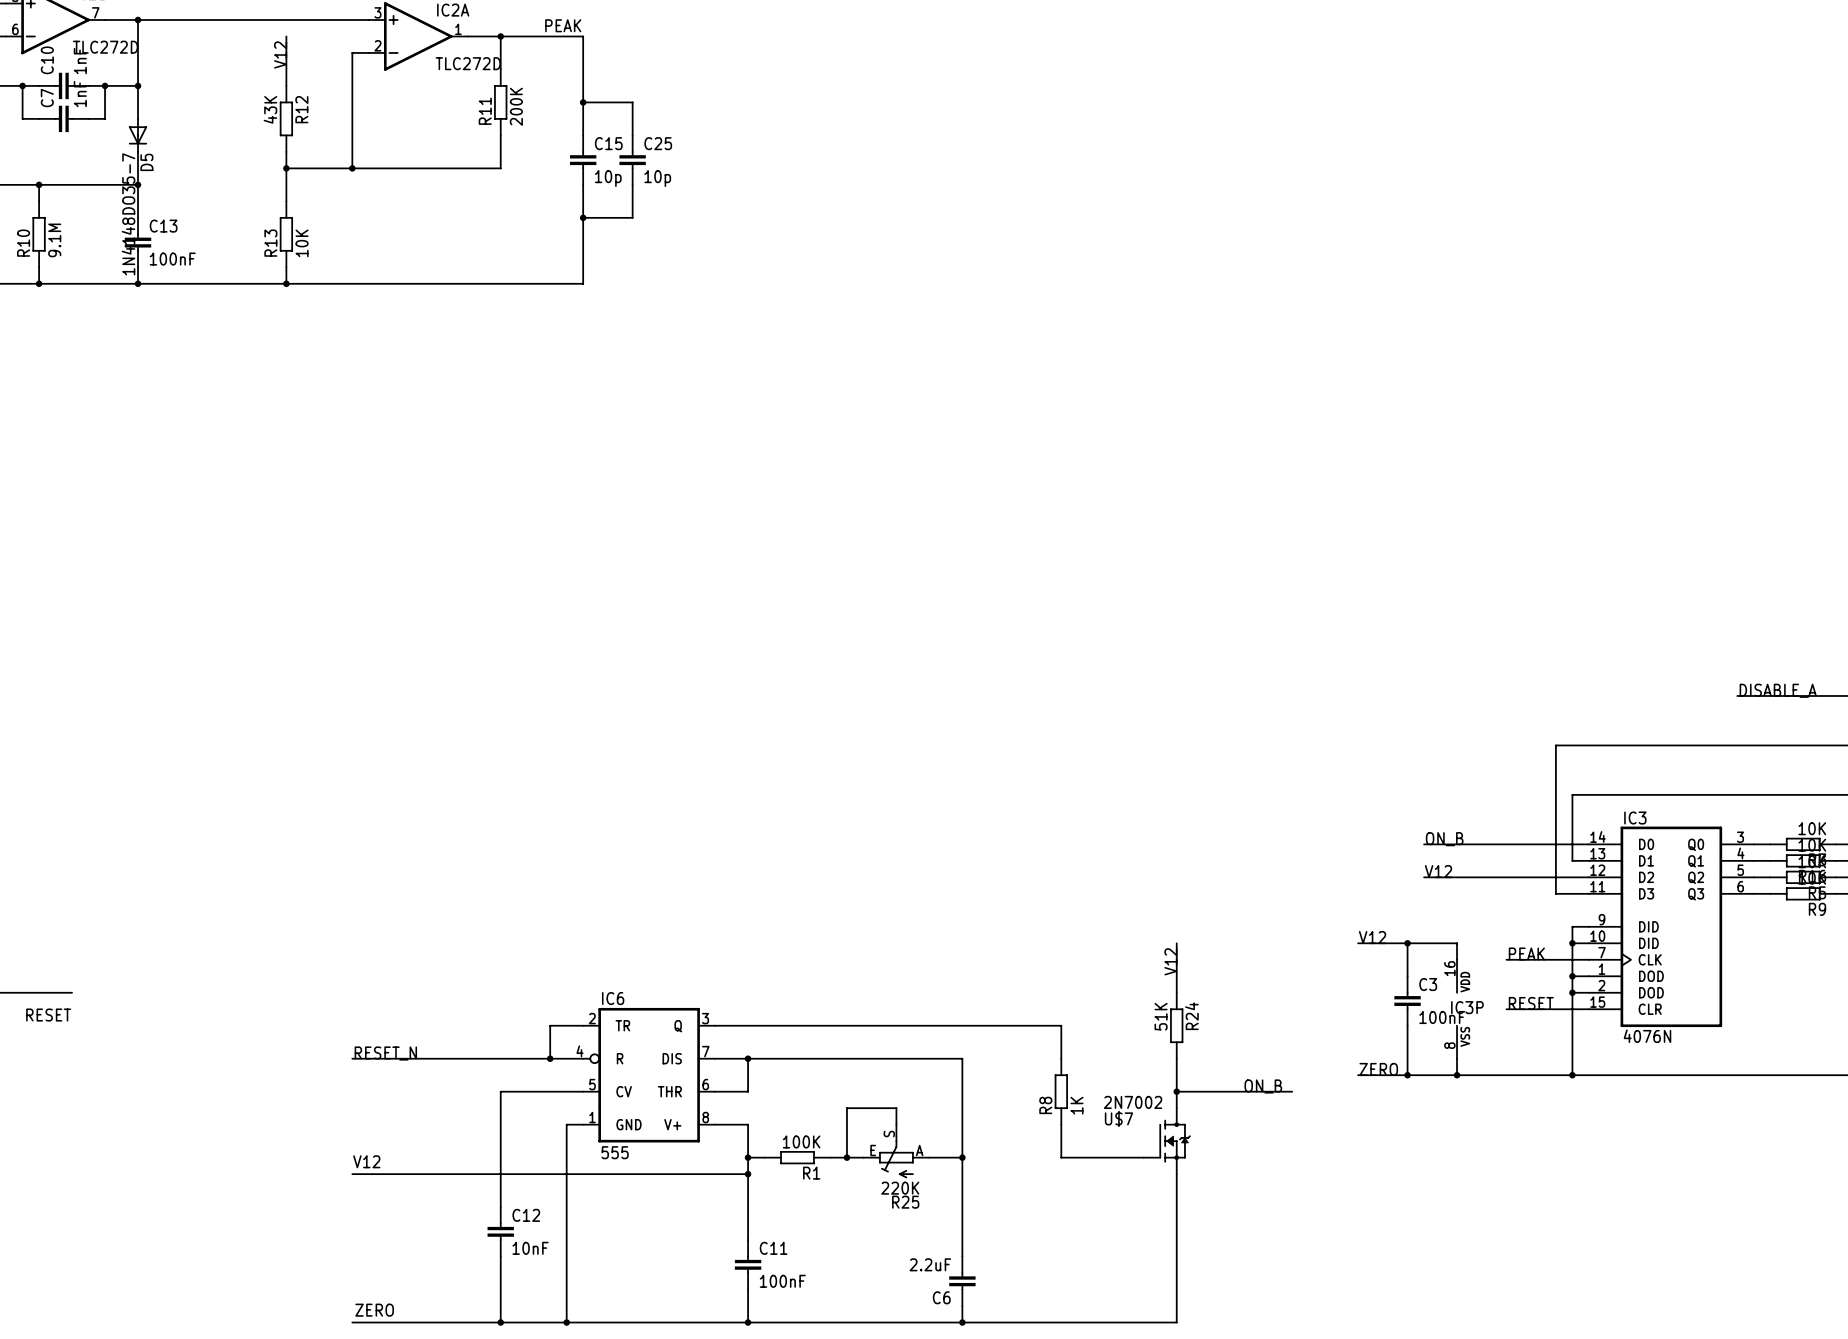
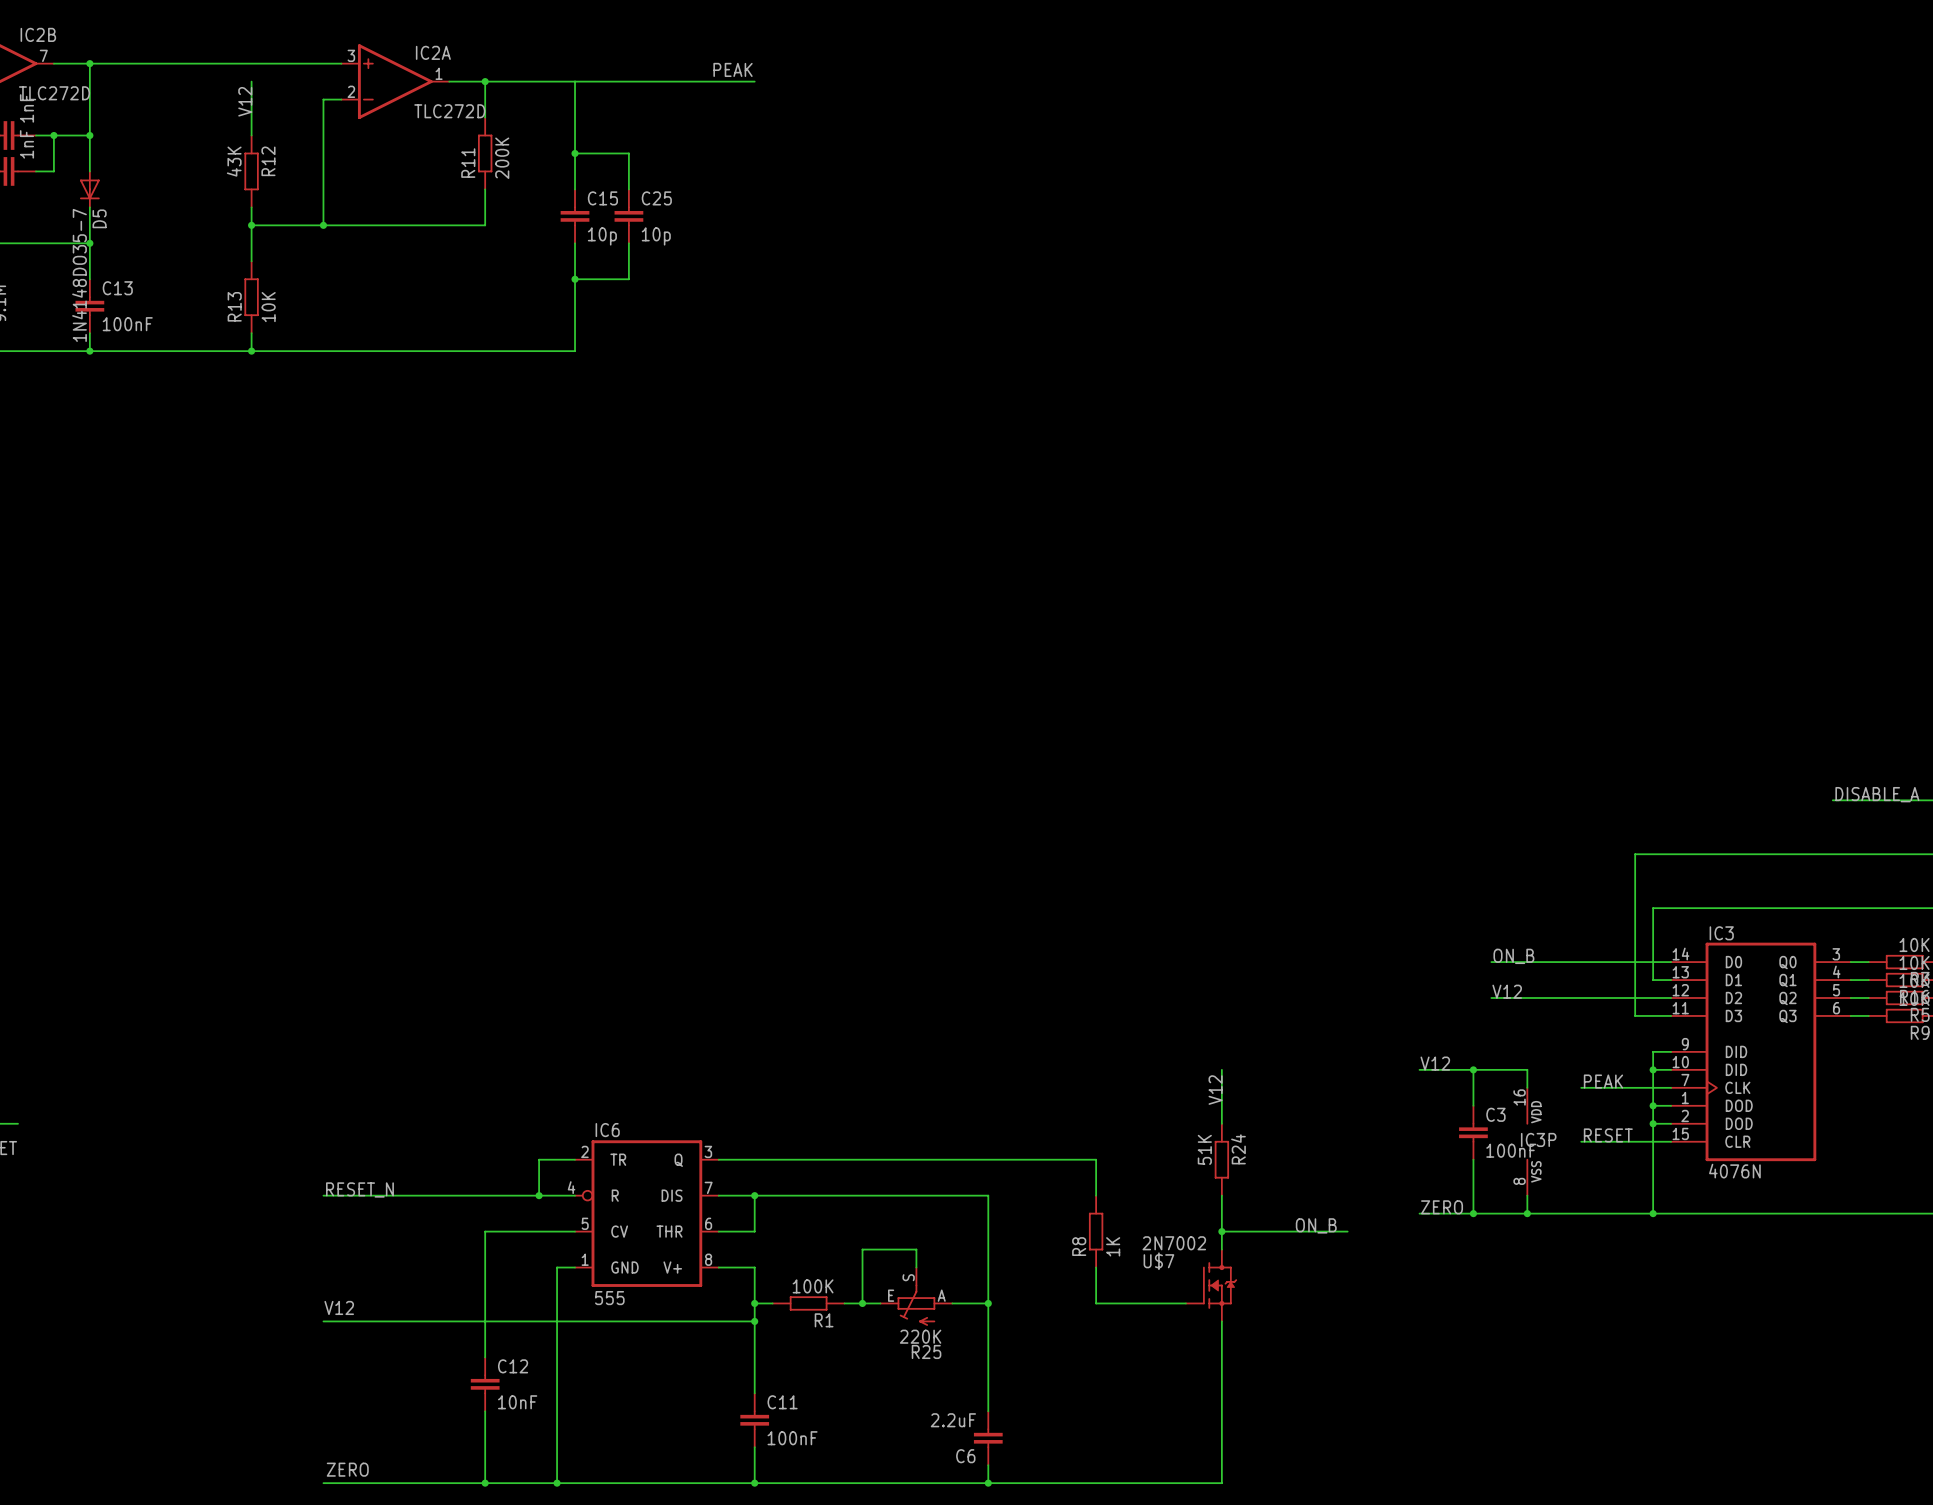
label: PEAK (563, 25) -> none
label: none -> PEAK (733, 69)
wire: none -> (575, 81) (754, 81)

